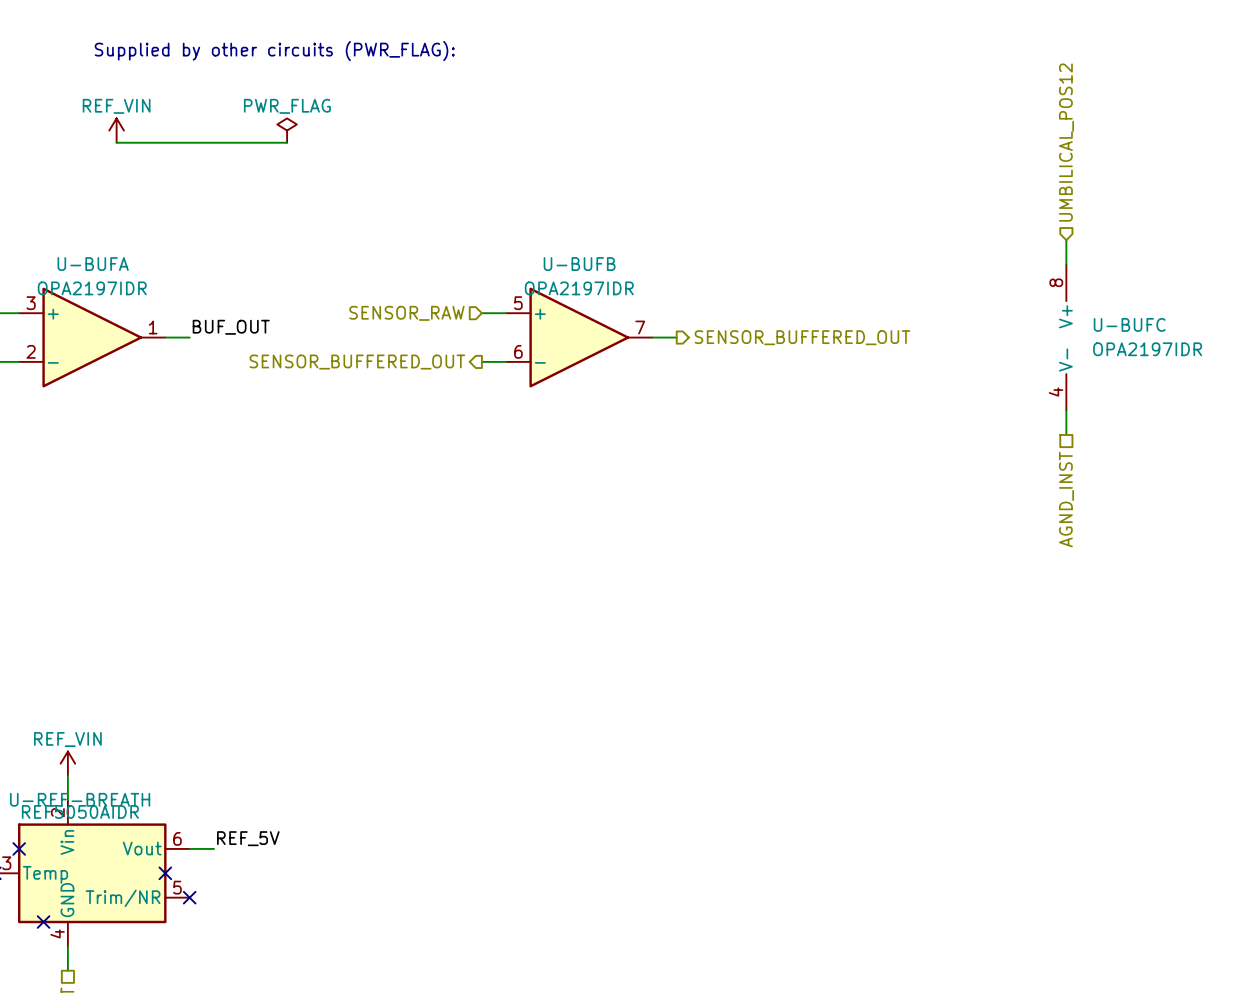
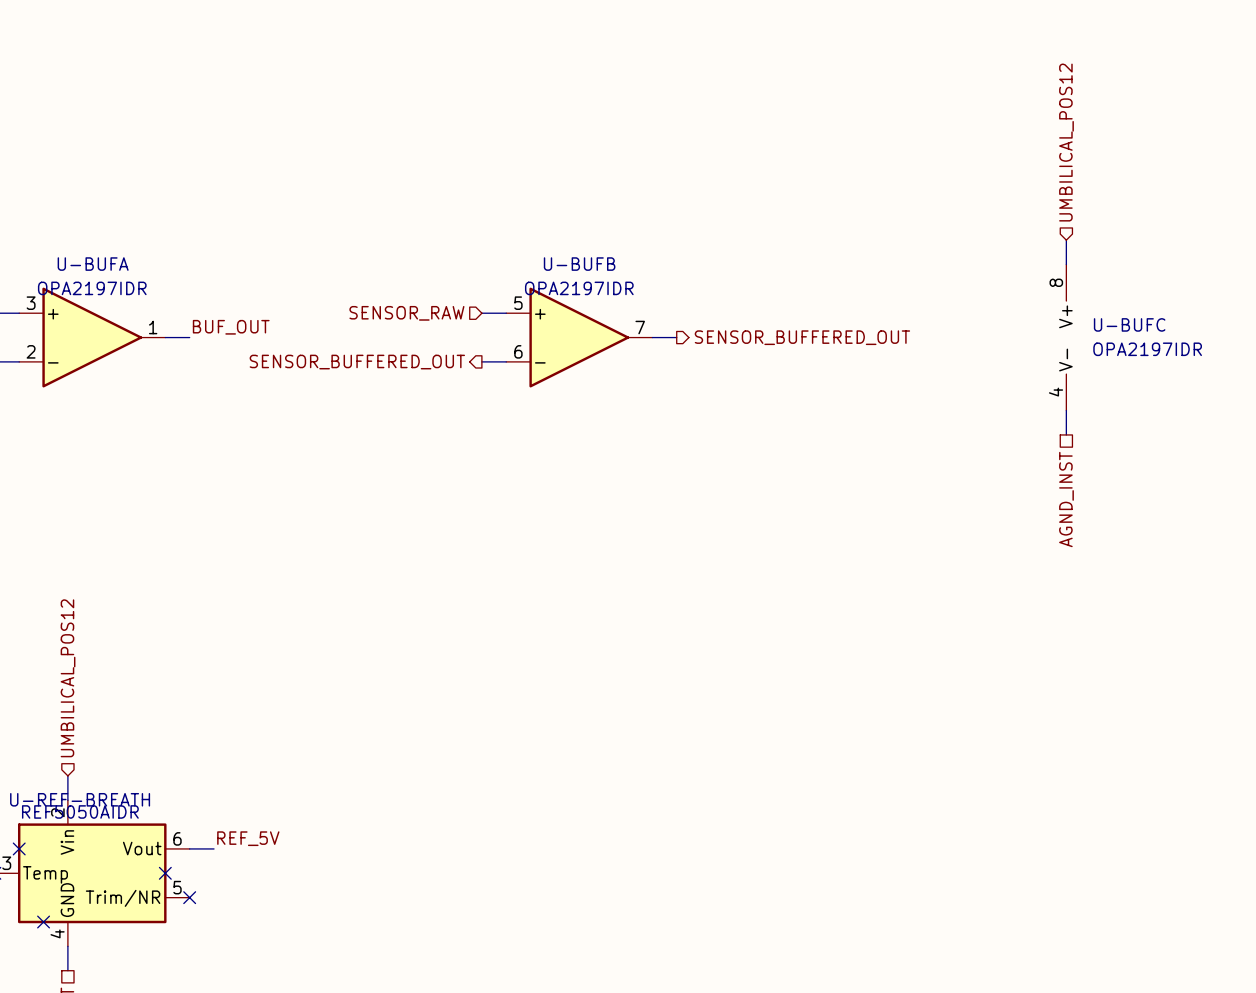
text: Supplied by other circuits (PWR_FLAG): (274, 51) -> none
power symbol: REF_VIN (116, 130) -> none
power symbol: PWR_FLAG (287, 130) -> none
wire: (116, 142) (287, 142) -> none
hierarchical label: none -> UMBILICAL_POS12 (68, 678)
power symbol: REF_VIN (67, 763) -> none

